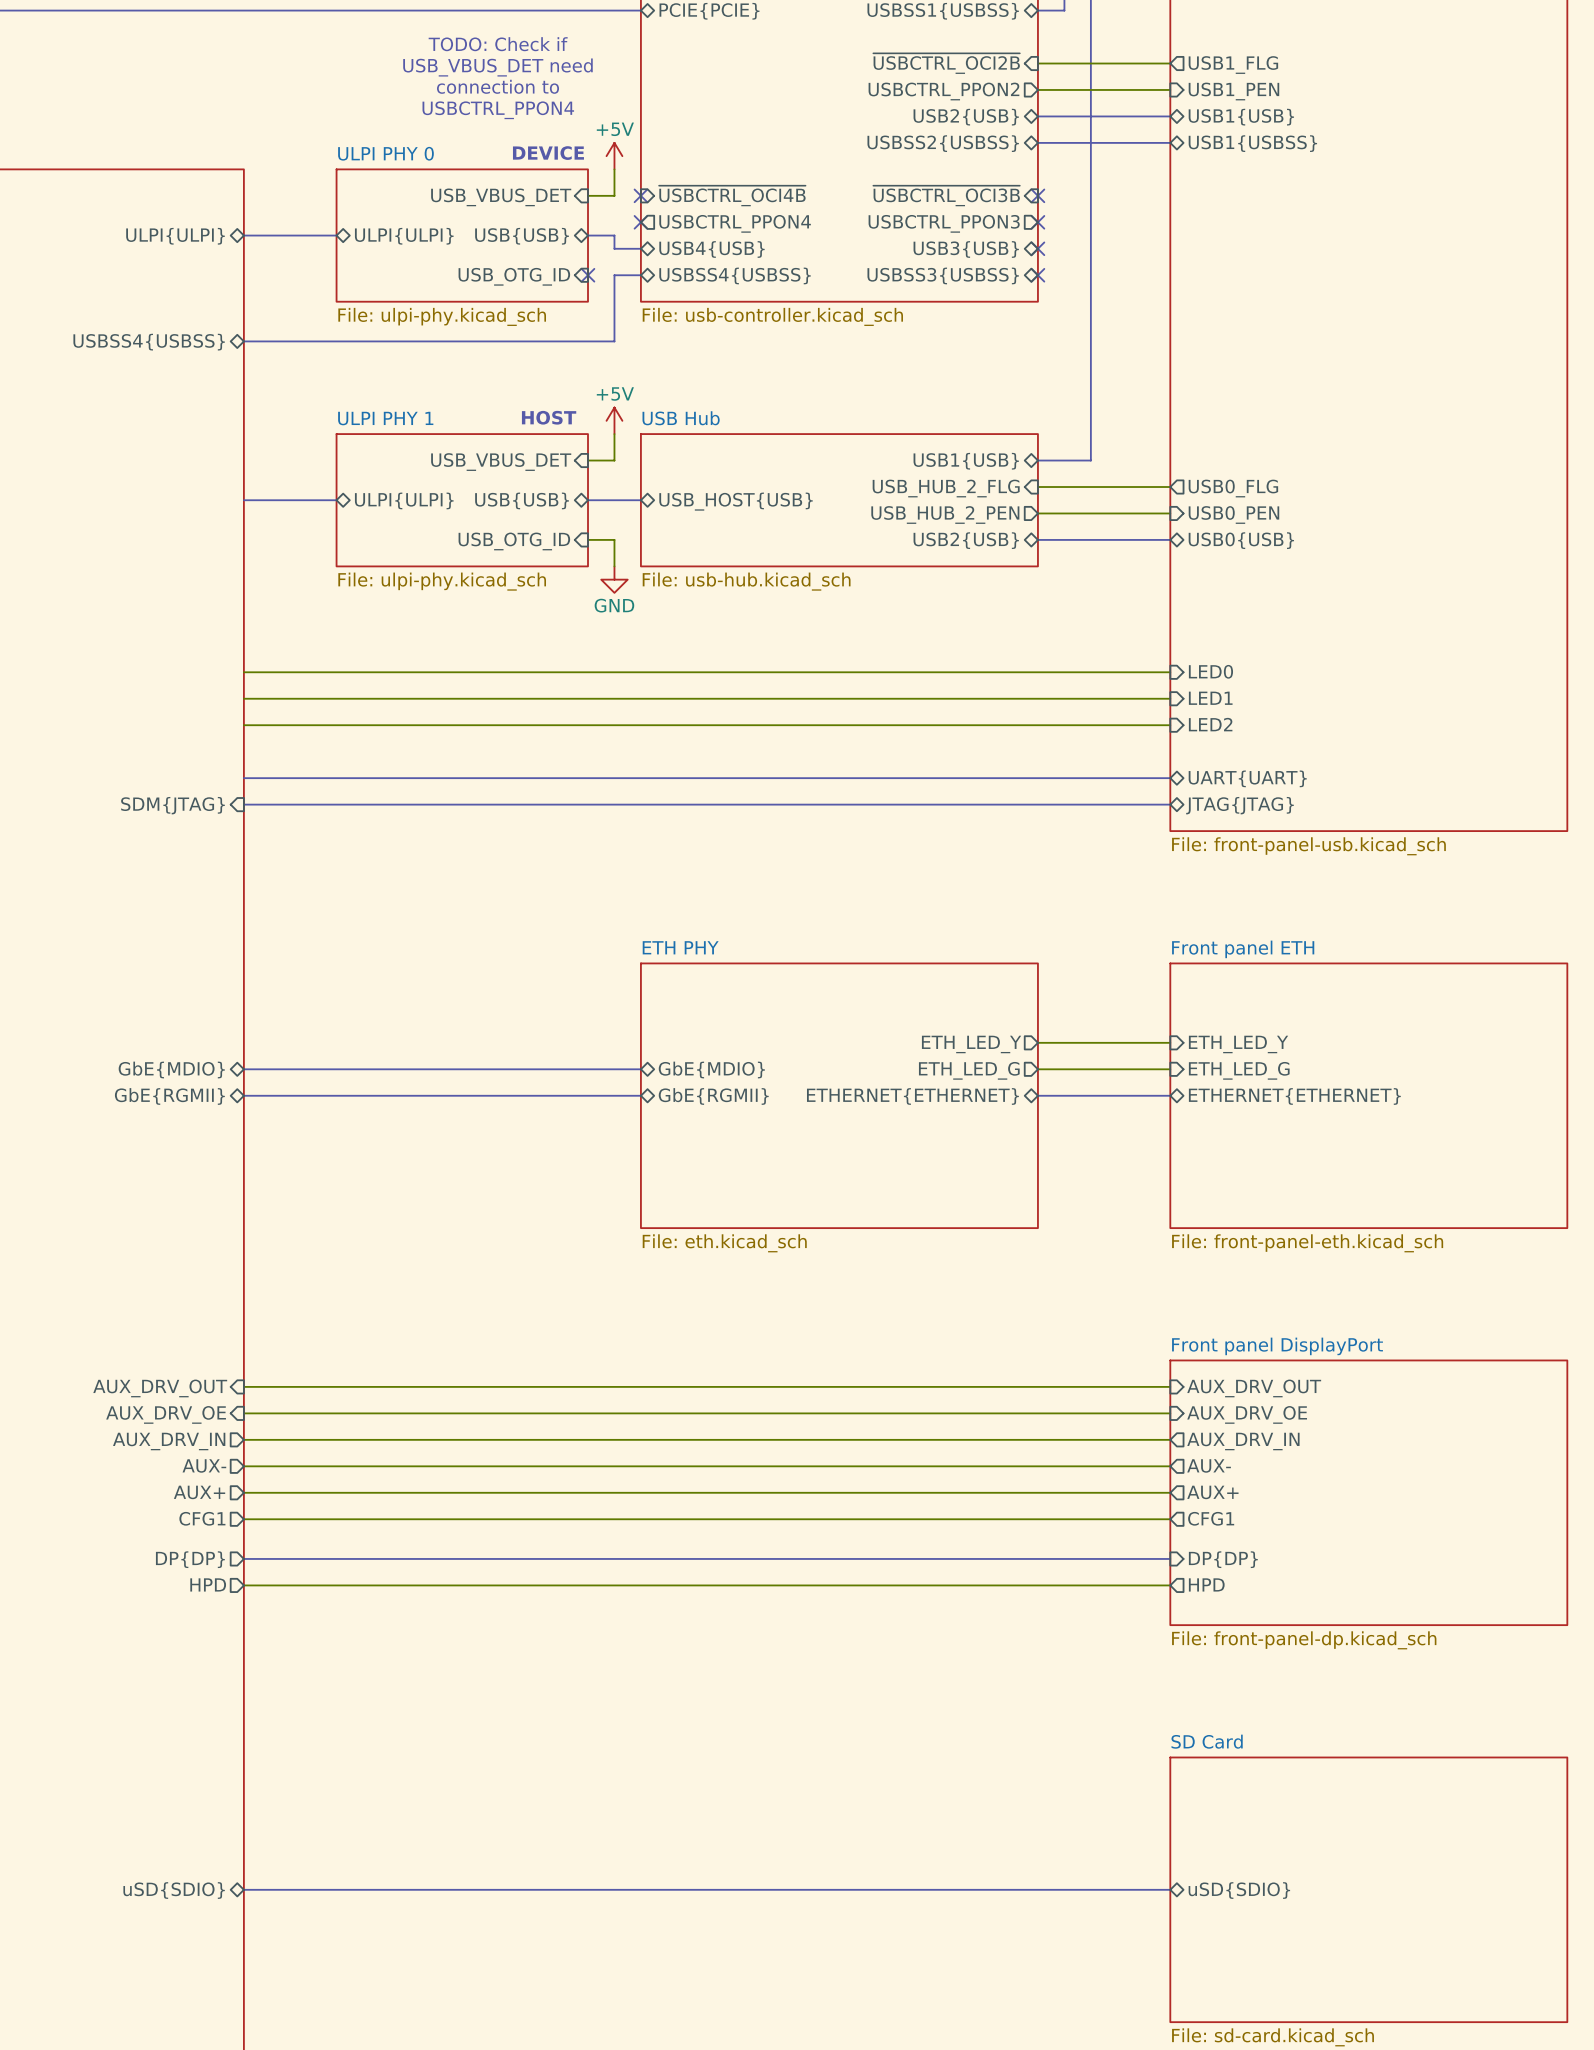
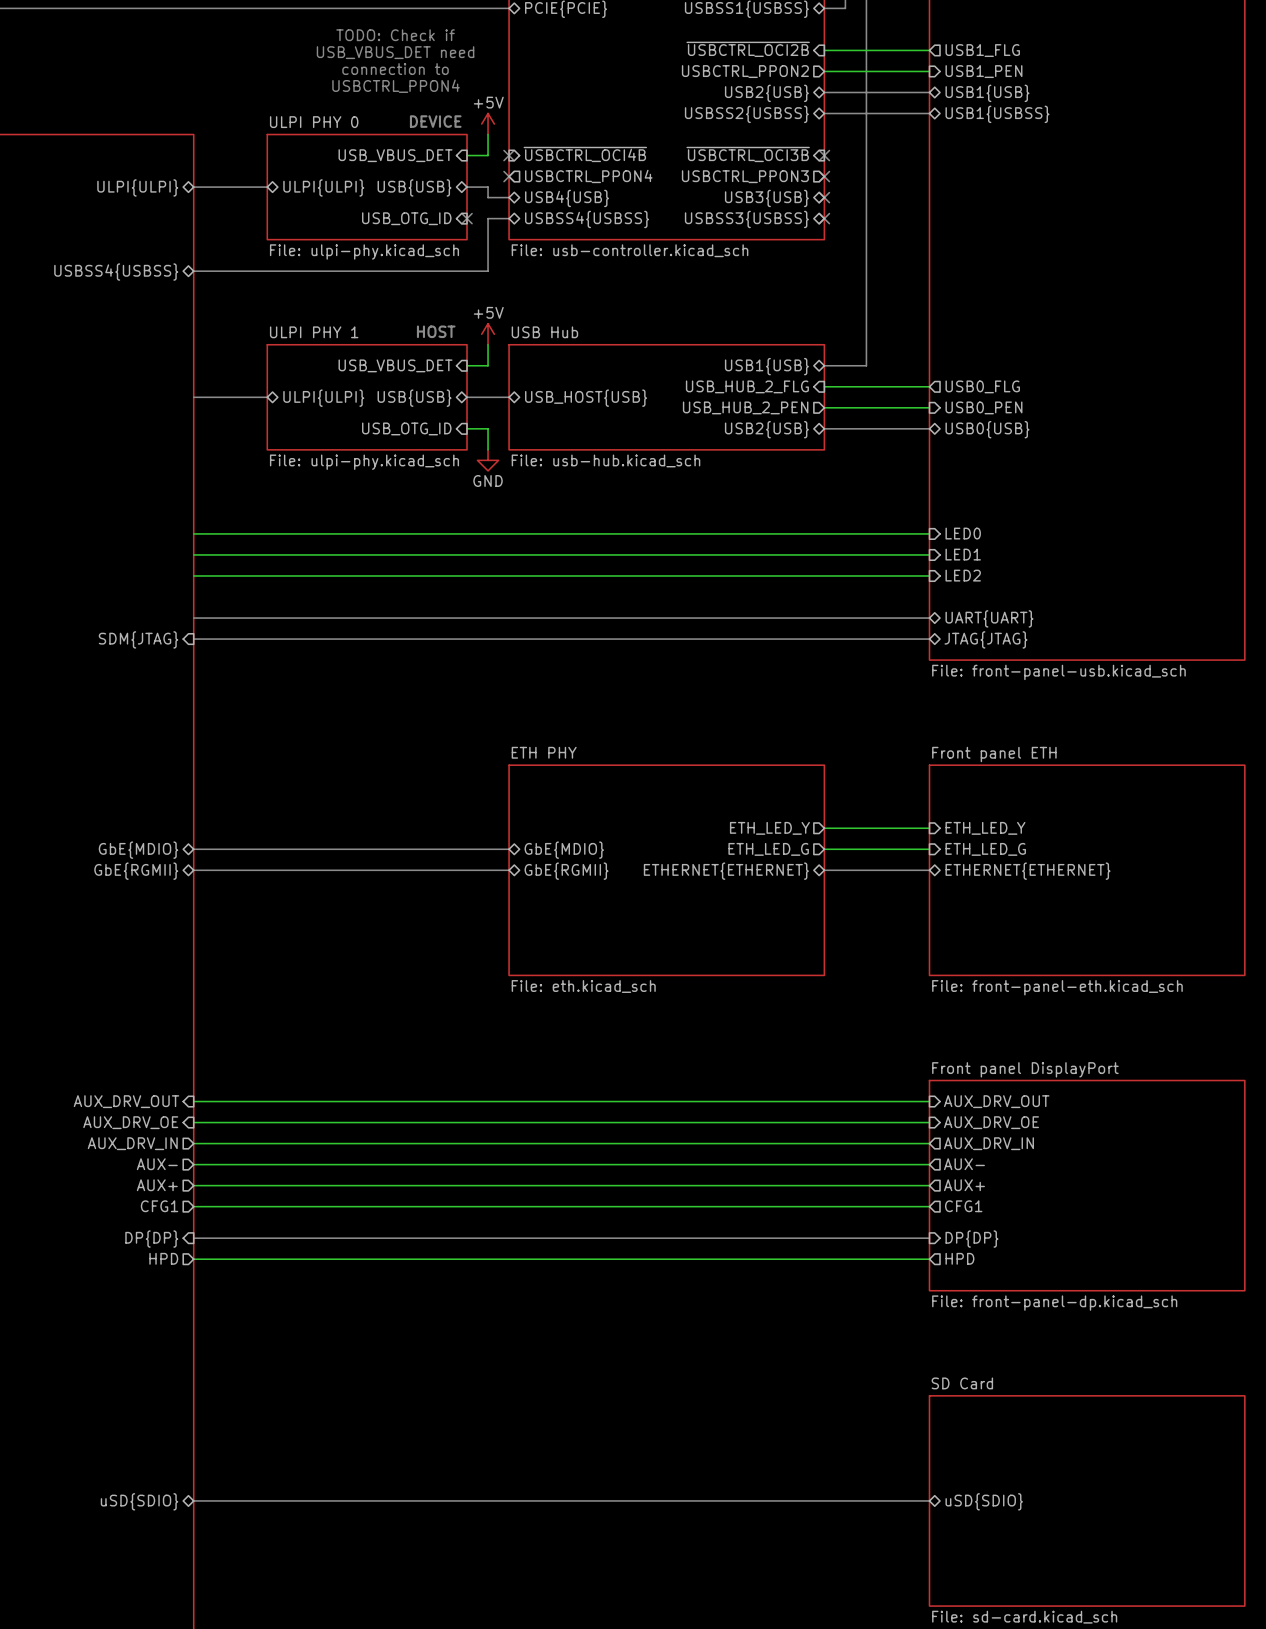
sheet pin shape: output (190, 1559) -> input (151, 1239)

